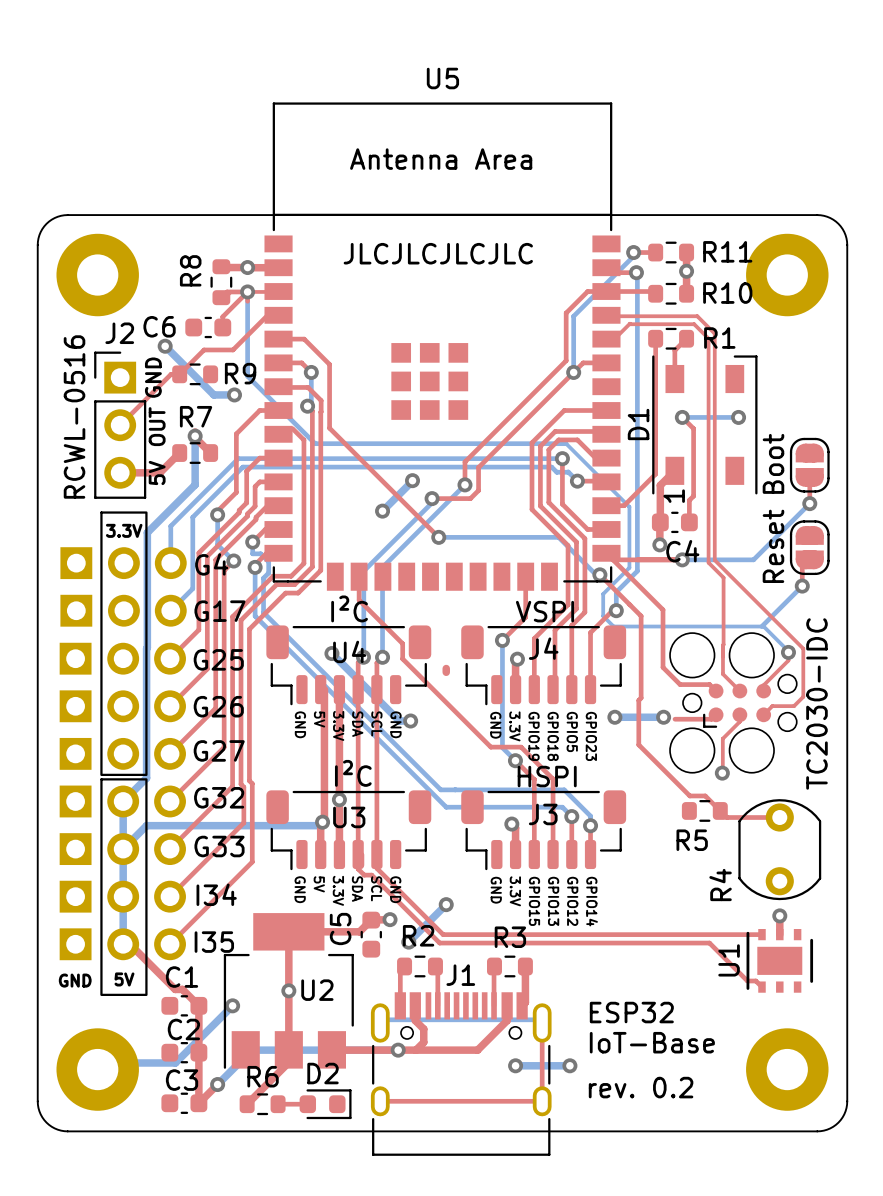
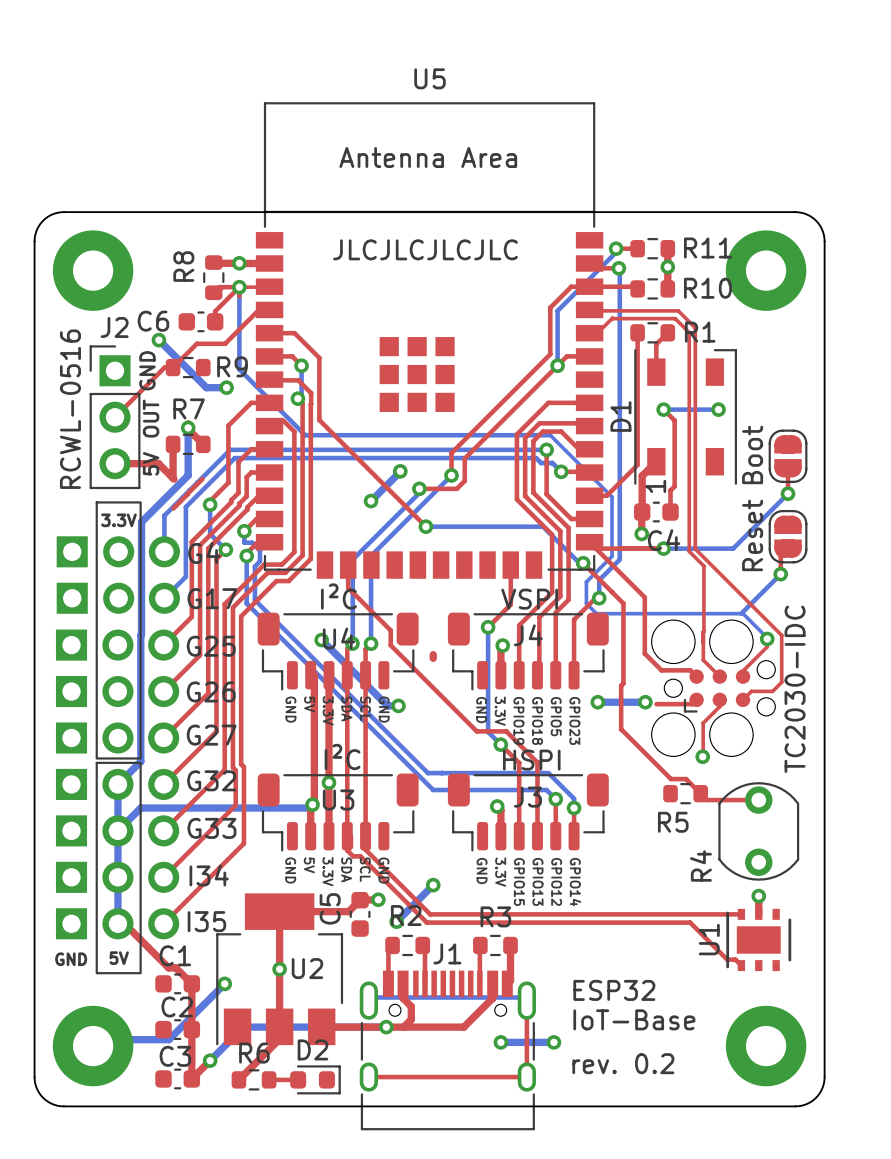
top track: (179, 453) (160, 472) -> (173, 444) (174, 479) (158, 463) (154, 463)
top track: none -> (202, 479) (173, 508)

